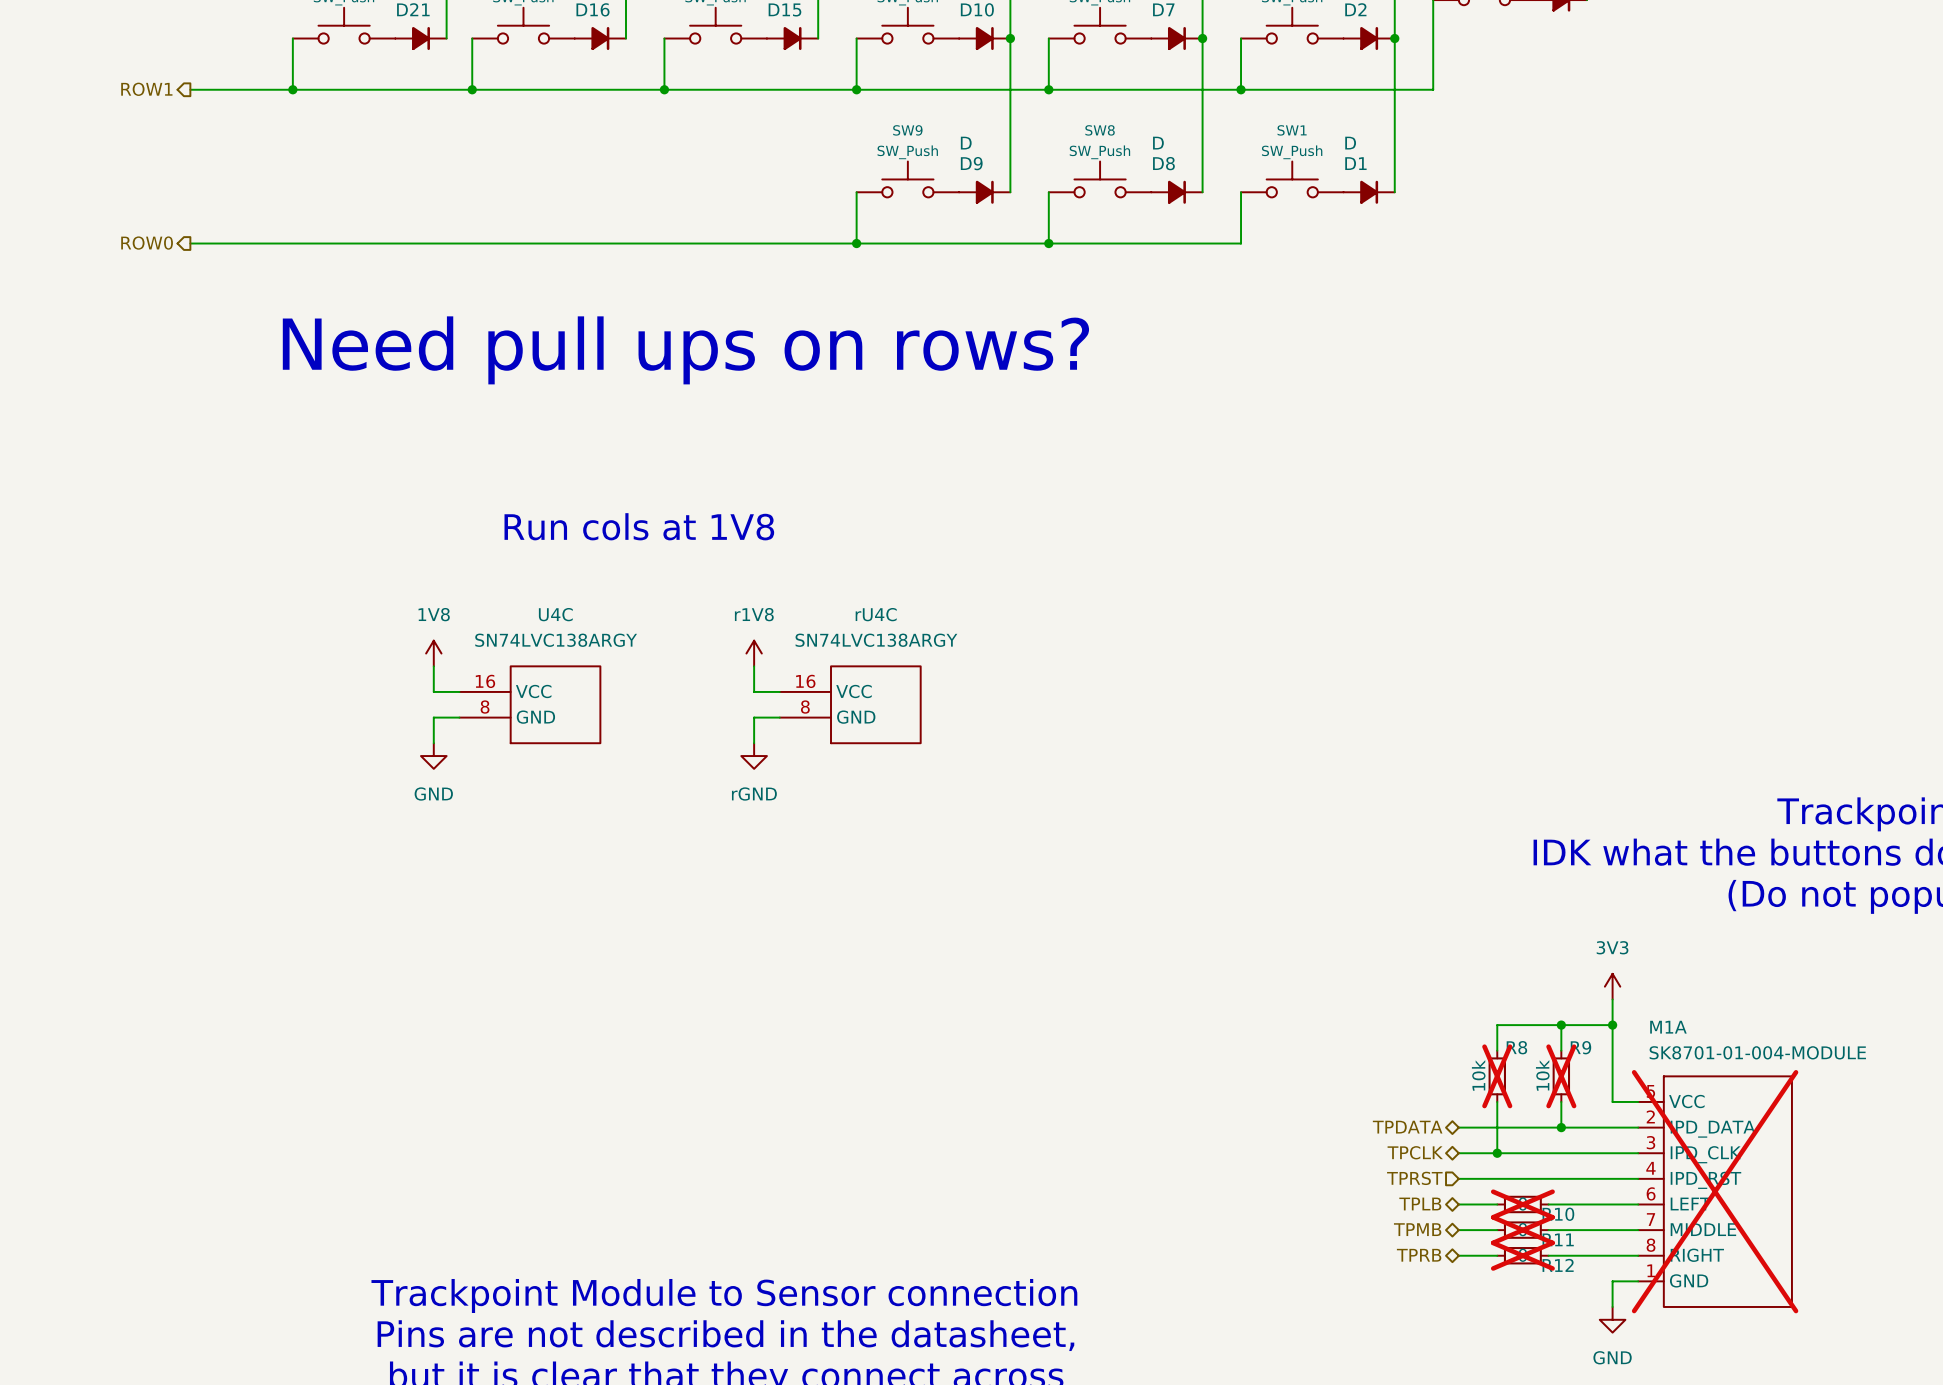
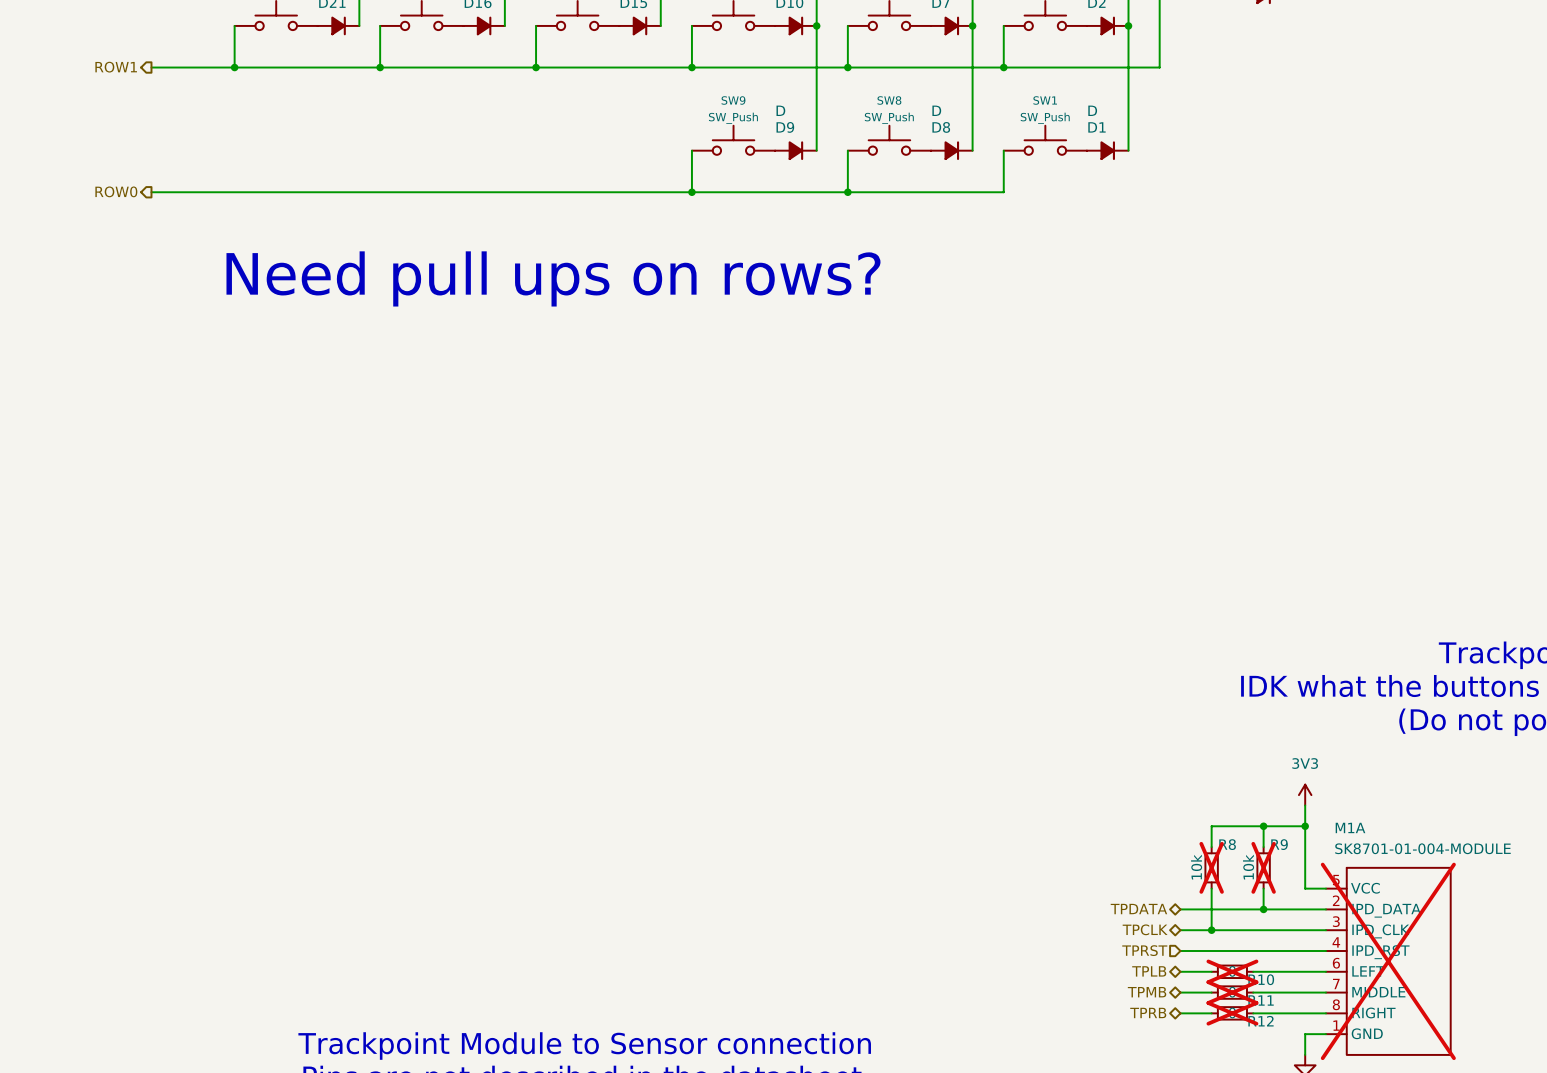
text: Run cols at 1V8 (639, 526) -> none
power symbol: 1V8 (433, 653) -> none
power symbol: r1V8 (754, 653) -> none
wire: (433, 666) (433, 691) (459, 691) -> none
wire: (754, 666) (754, 691) (779, 691) -> none
U4C: SN74LVC138ARGY (529, 704) -> none
rU4C: SN74LVC138ARGY (850, 704) -> none
wire: (459, 717) (433, 717) (433, 743) -> none
wire: (779, 717) (754, 717) (754, 743) -> none
power symbol: GND (433, 756) -> none
power symbol: rGND (754, 756) -> none

